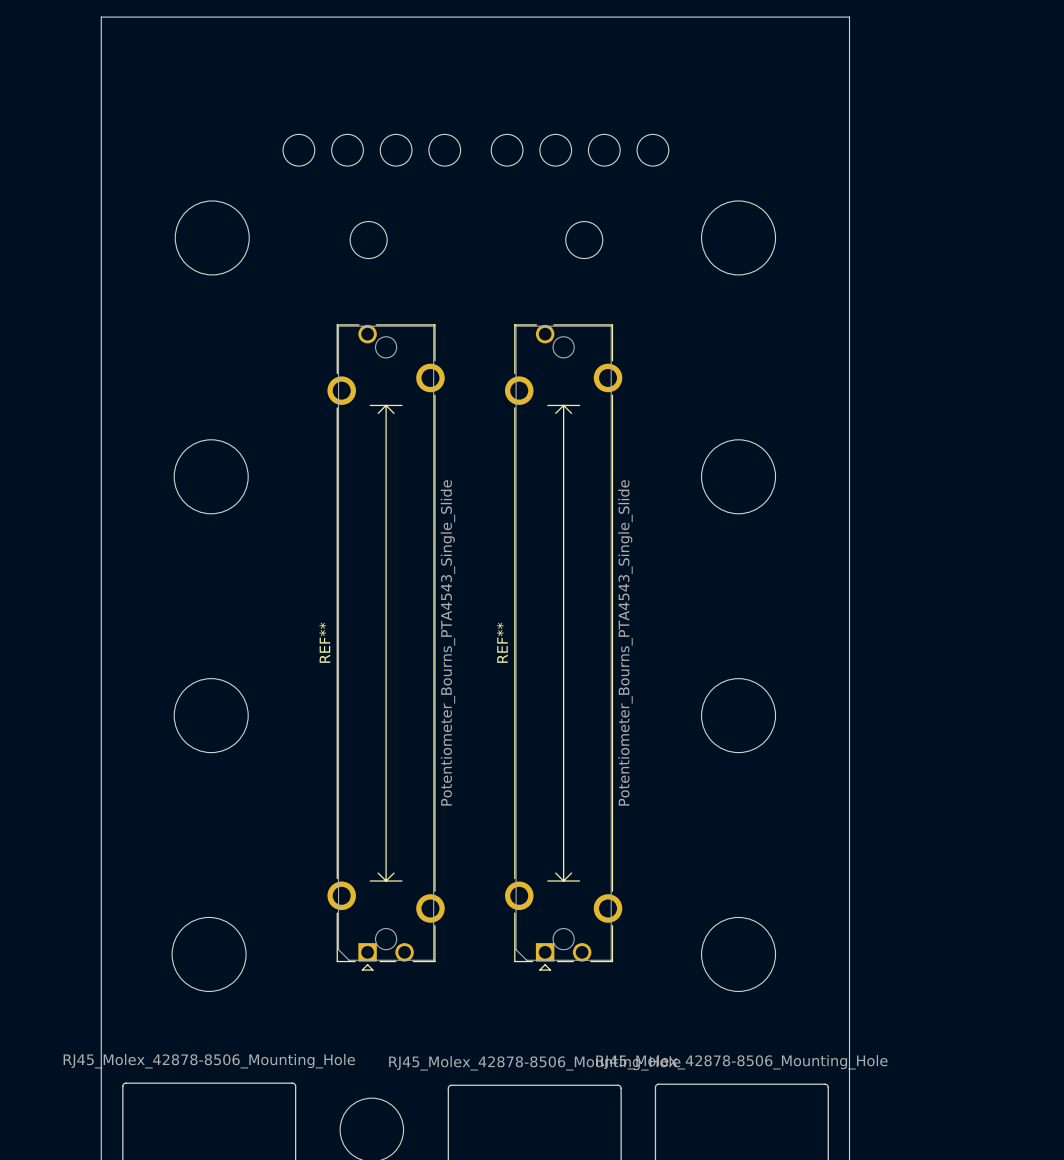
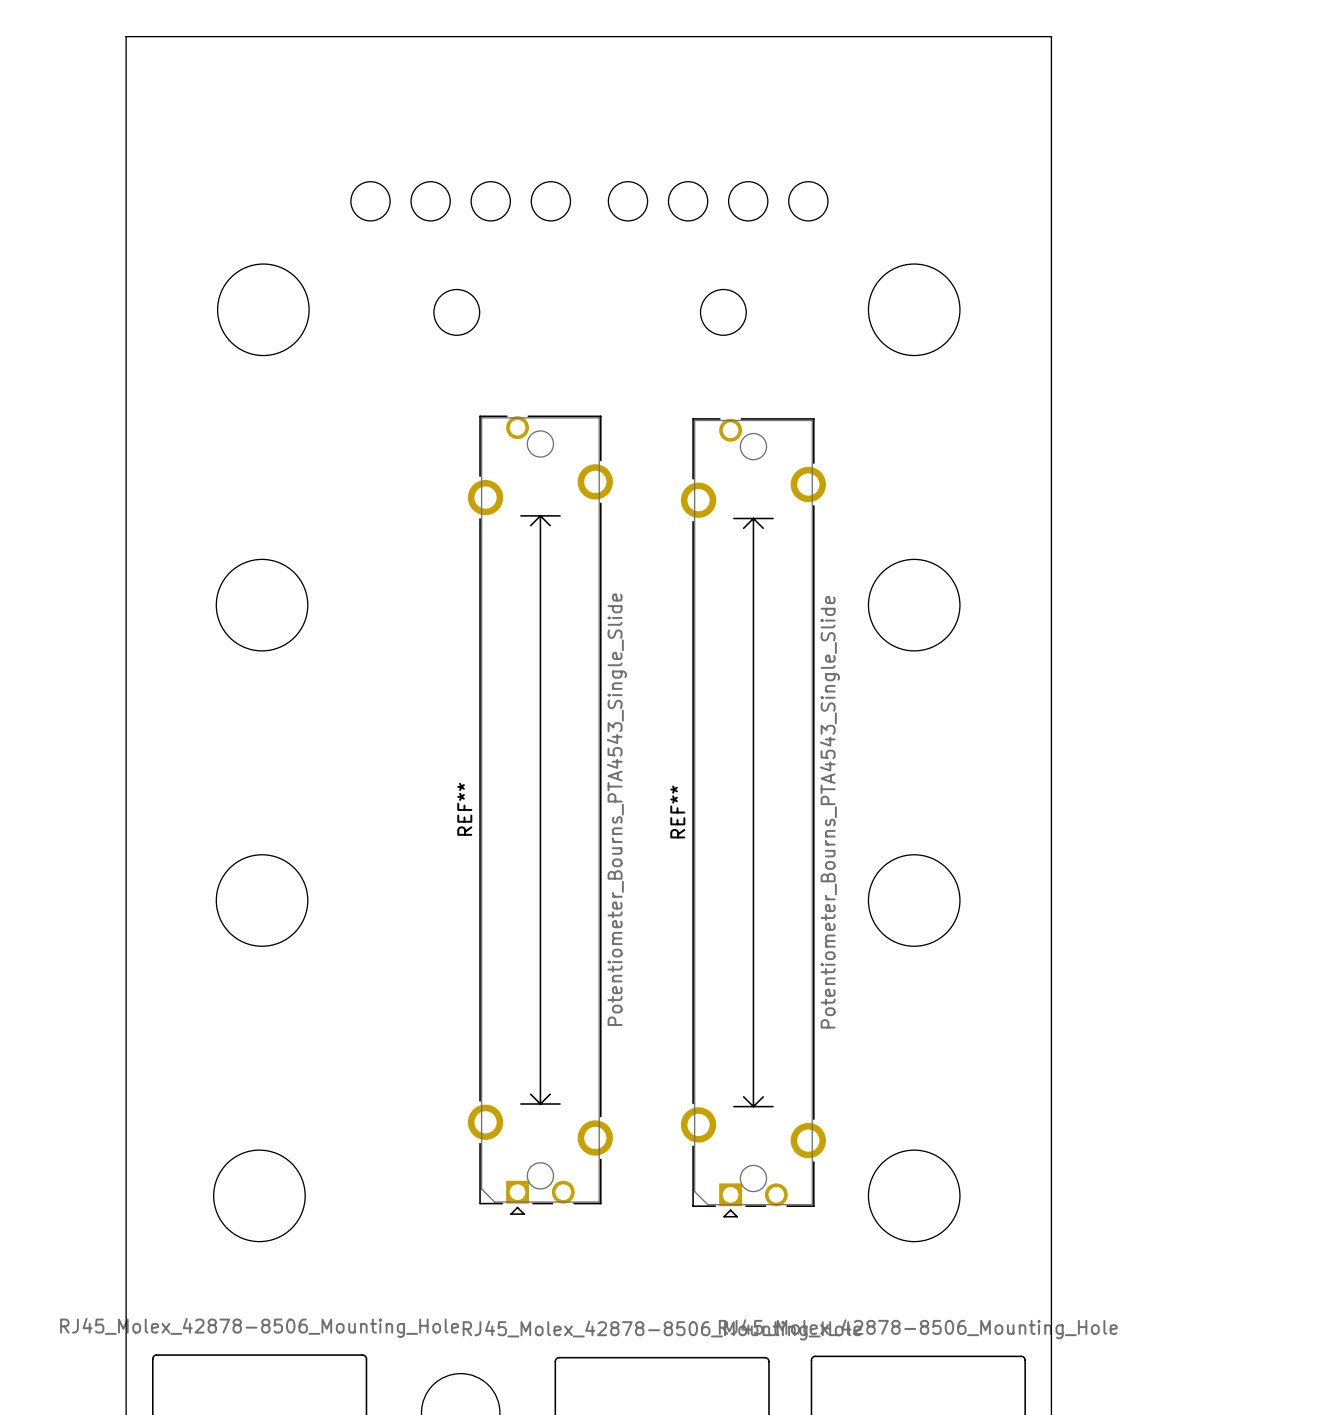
REF** position: (386, 647) -> (540, 815)
REF** position: (563, 647) -> (753, 817)

